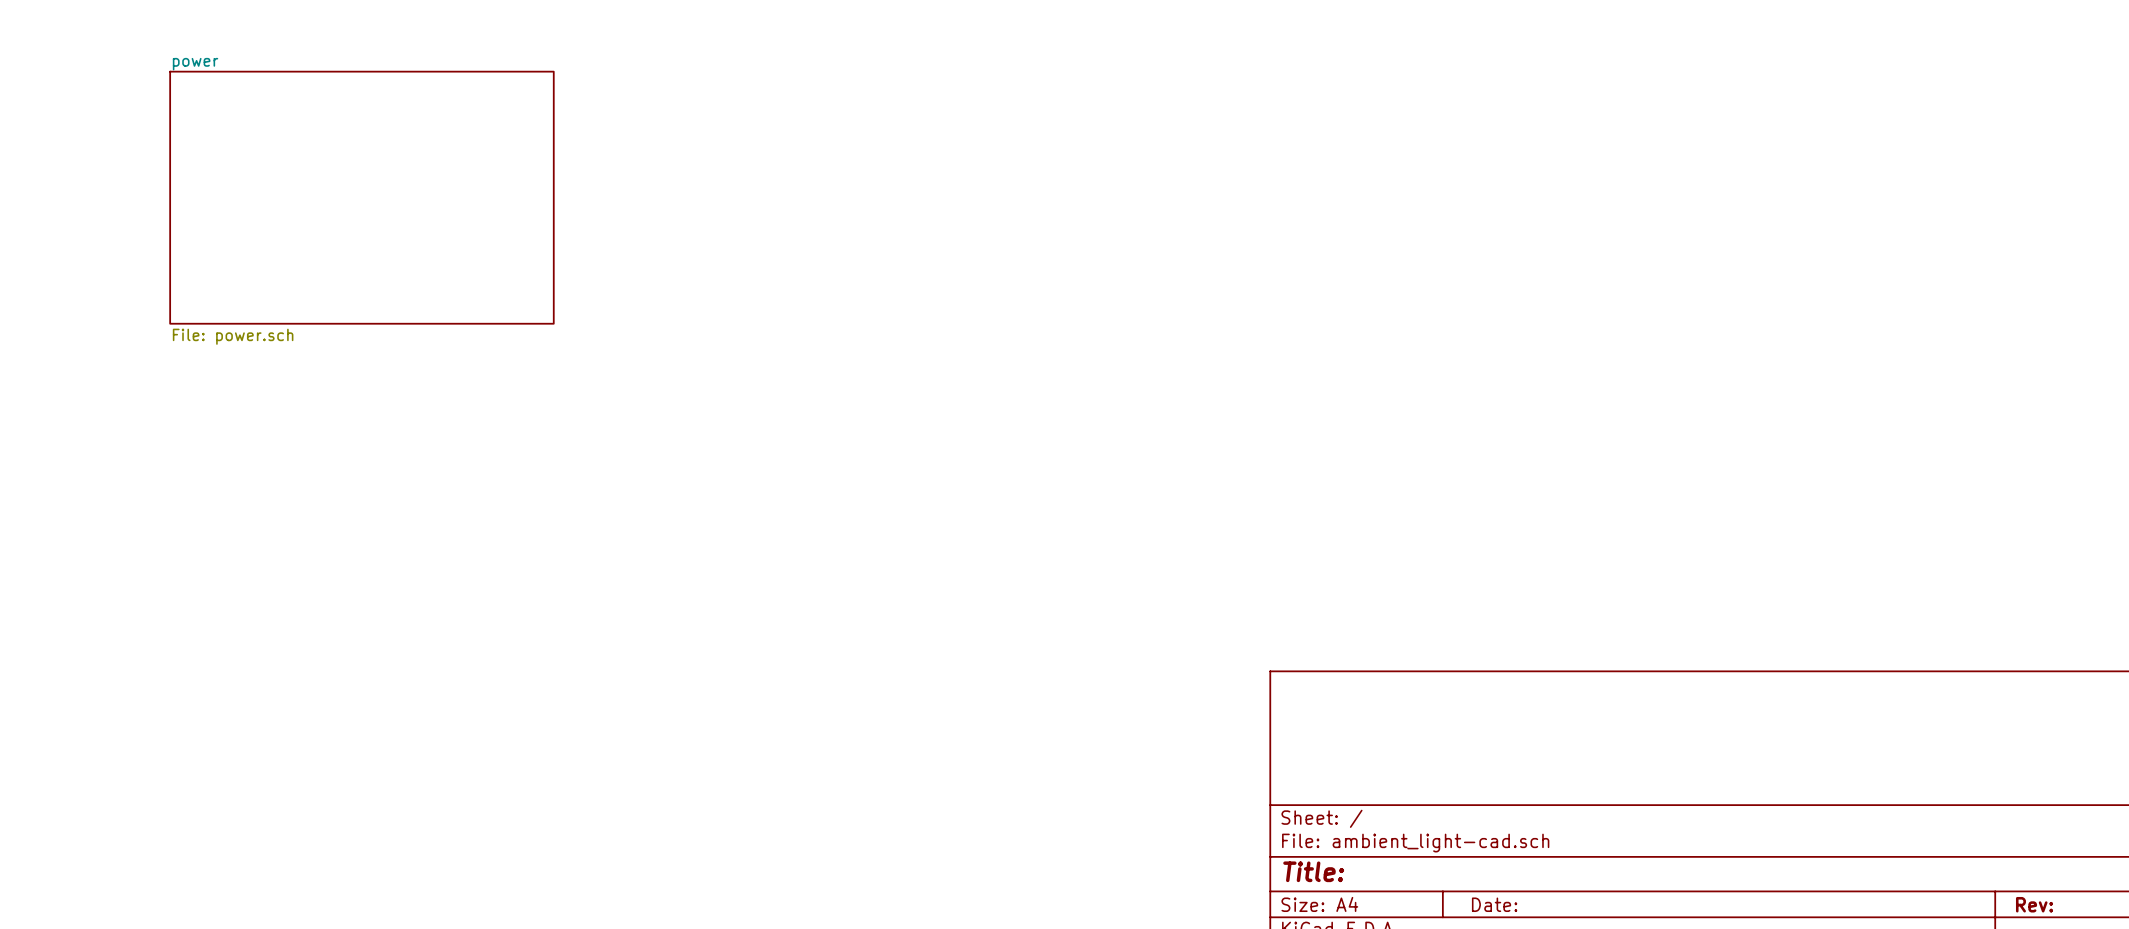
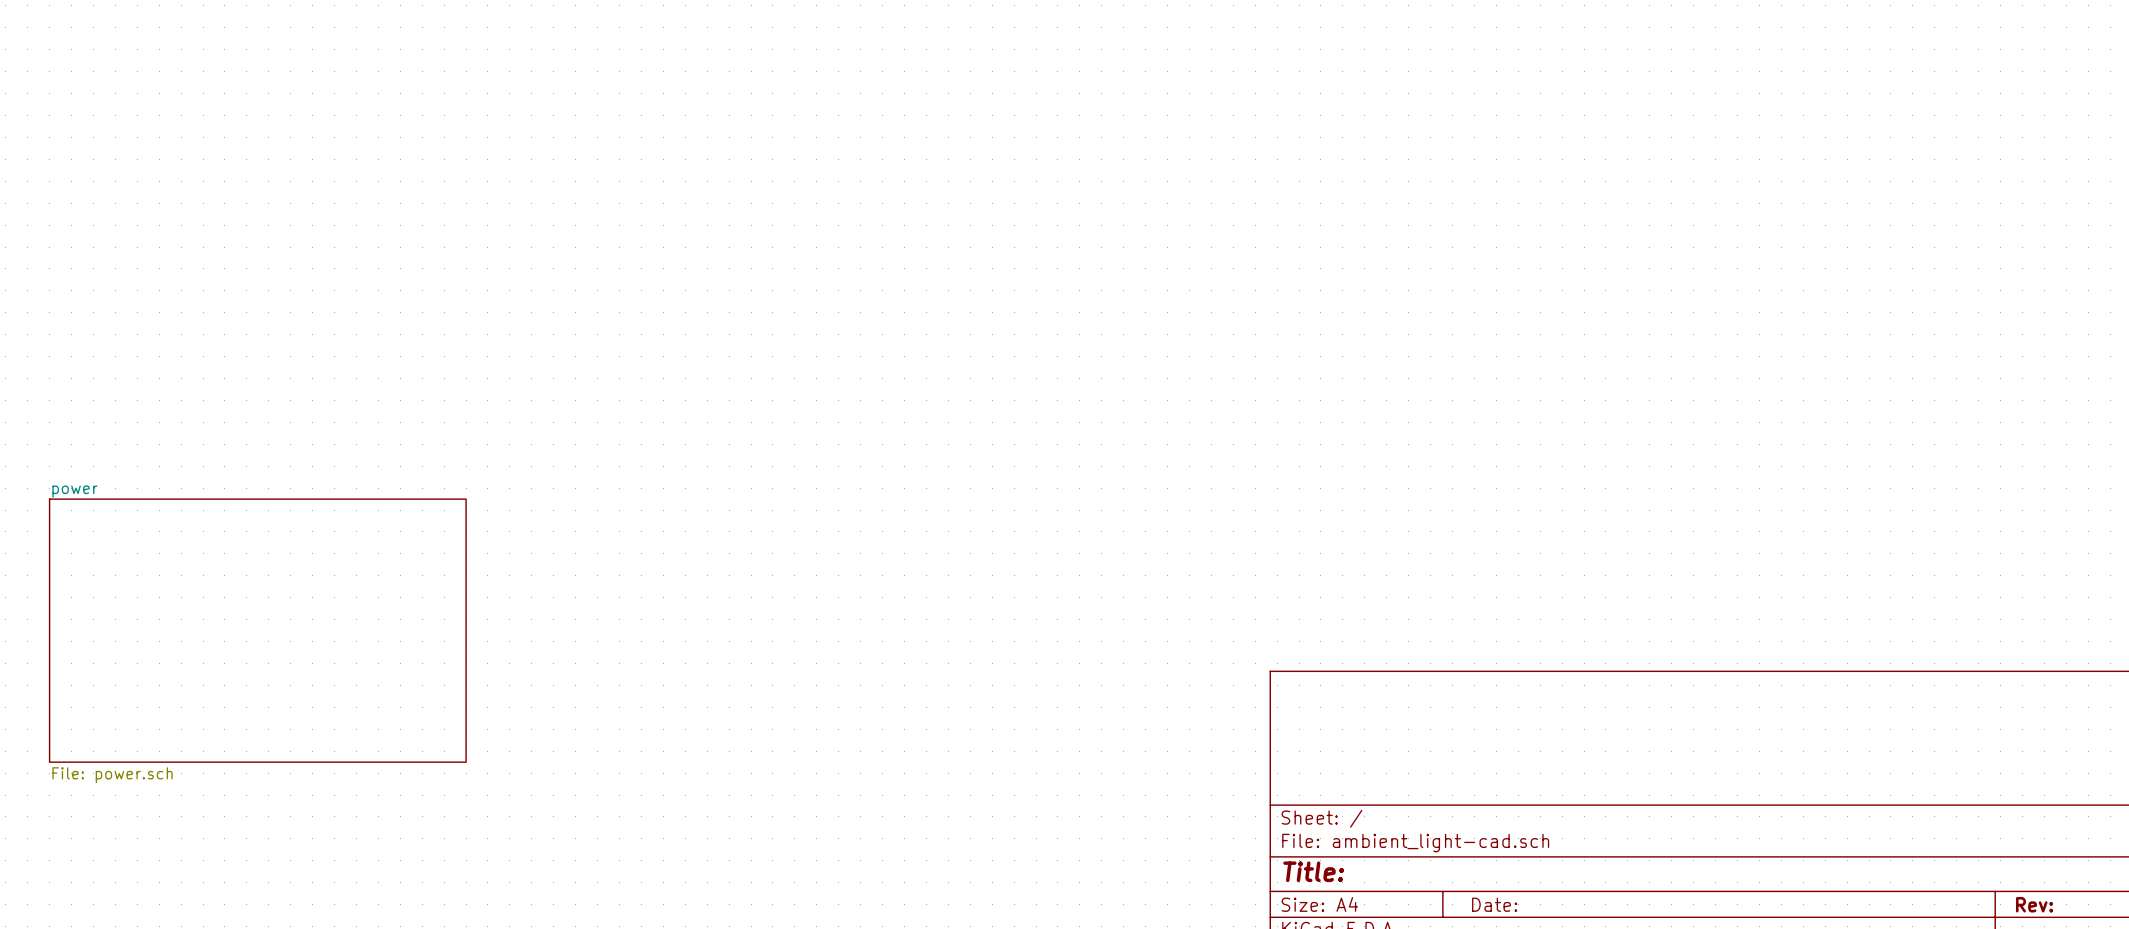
sheet power: File: power.sch (361, 197) -> none
sheet power: none -> File: power.sch (257, 630)

